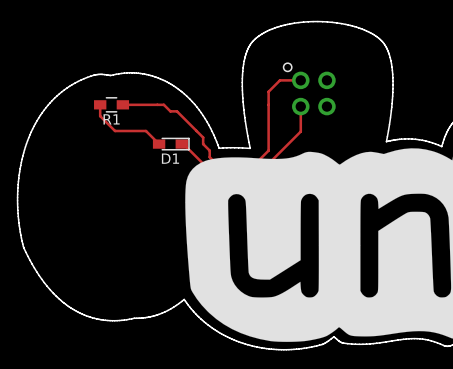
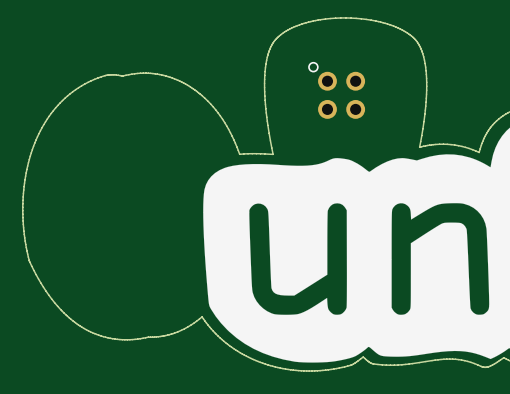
track: (300, 80) (279, 80) (268, 91) (268, 150) (255, 163) (216, 163) (209, 157) (209, 150) (203, 144) (203, 137) (176, 111) (170, 111) (163, 104) (122, 104) -> none
track: (100, 104) (100, 116) (115, 131) (146, 131) (159, 144) -> none
R1: (111, 104) -> none
track: (300, 106) (300, 131) (262, 170) (209, 170) (181, 144) -> none
D1: (171, 144) -> none

